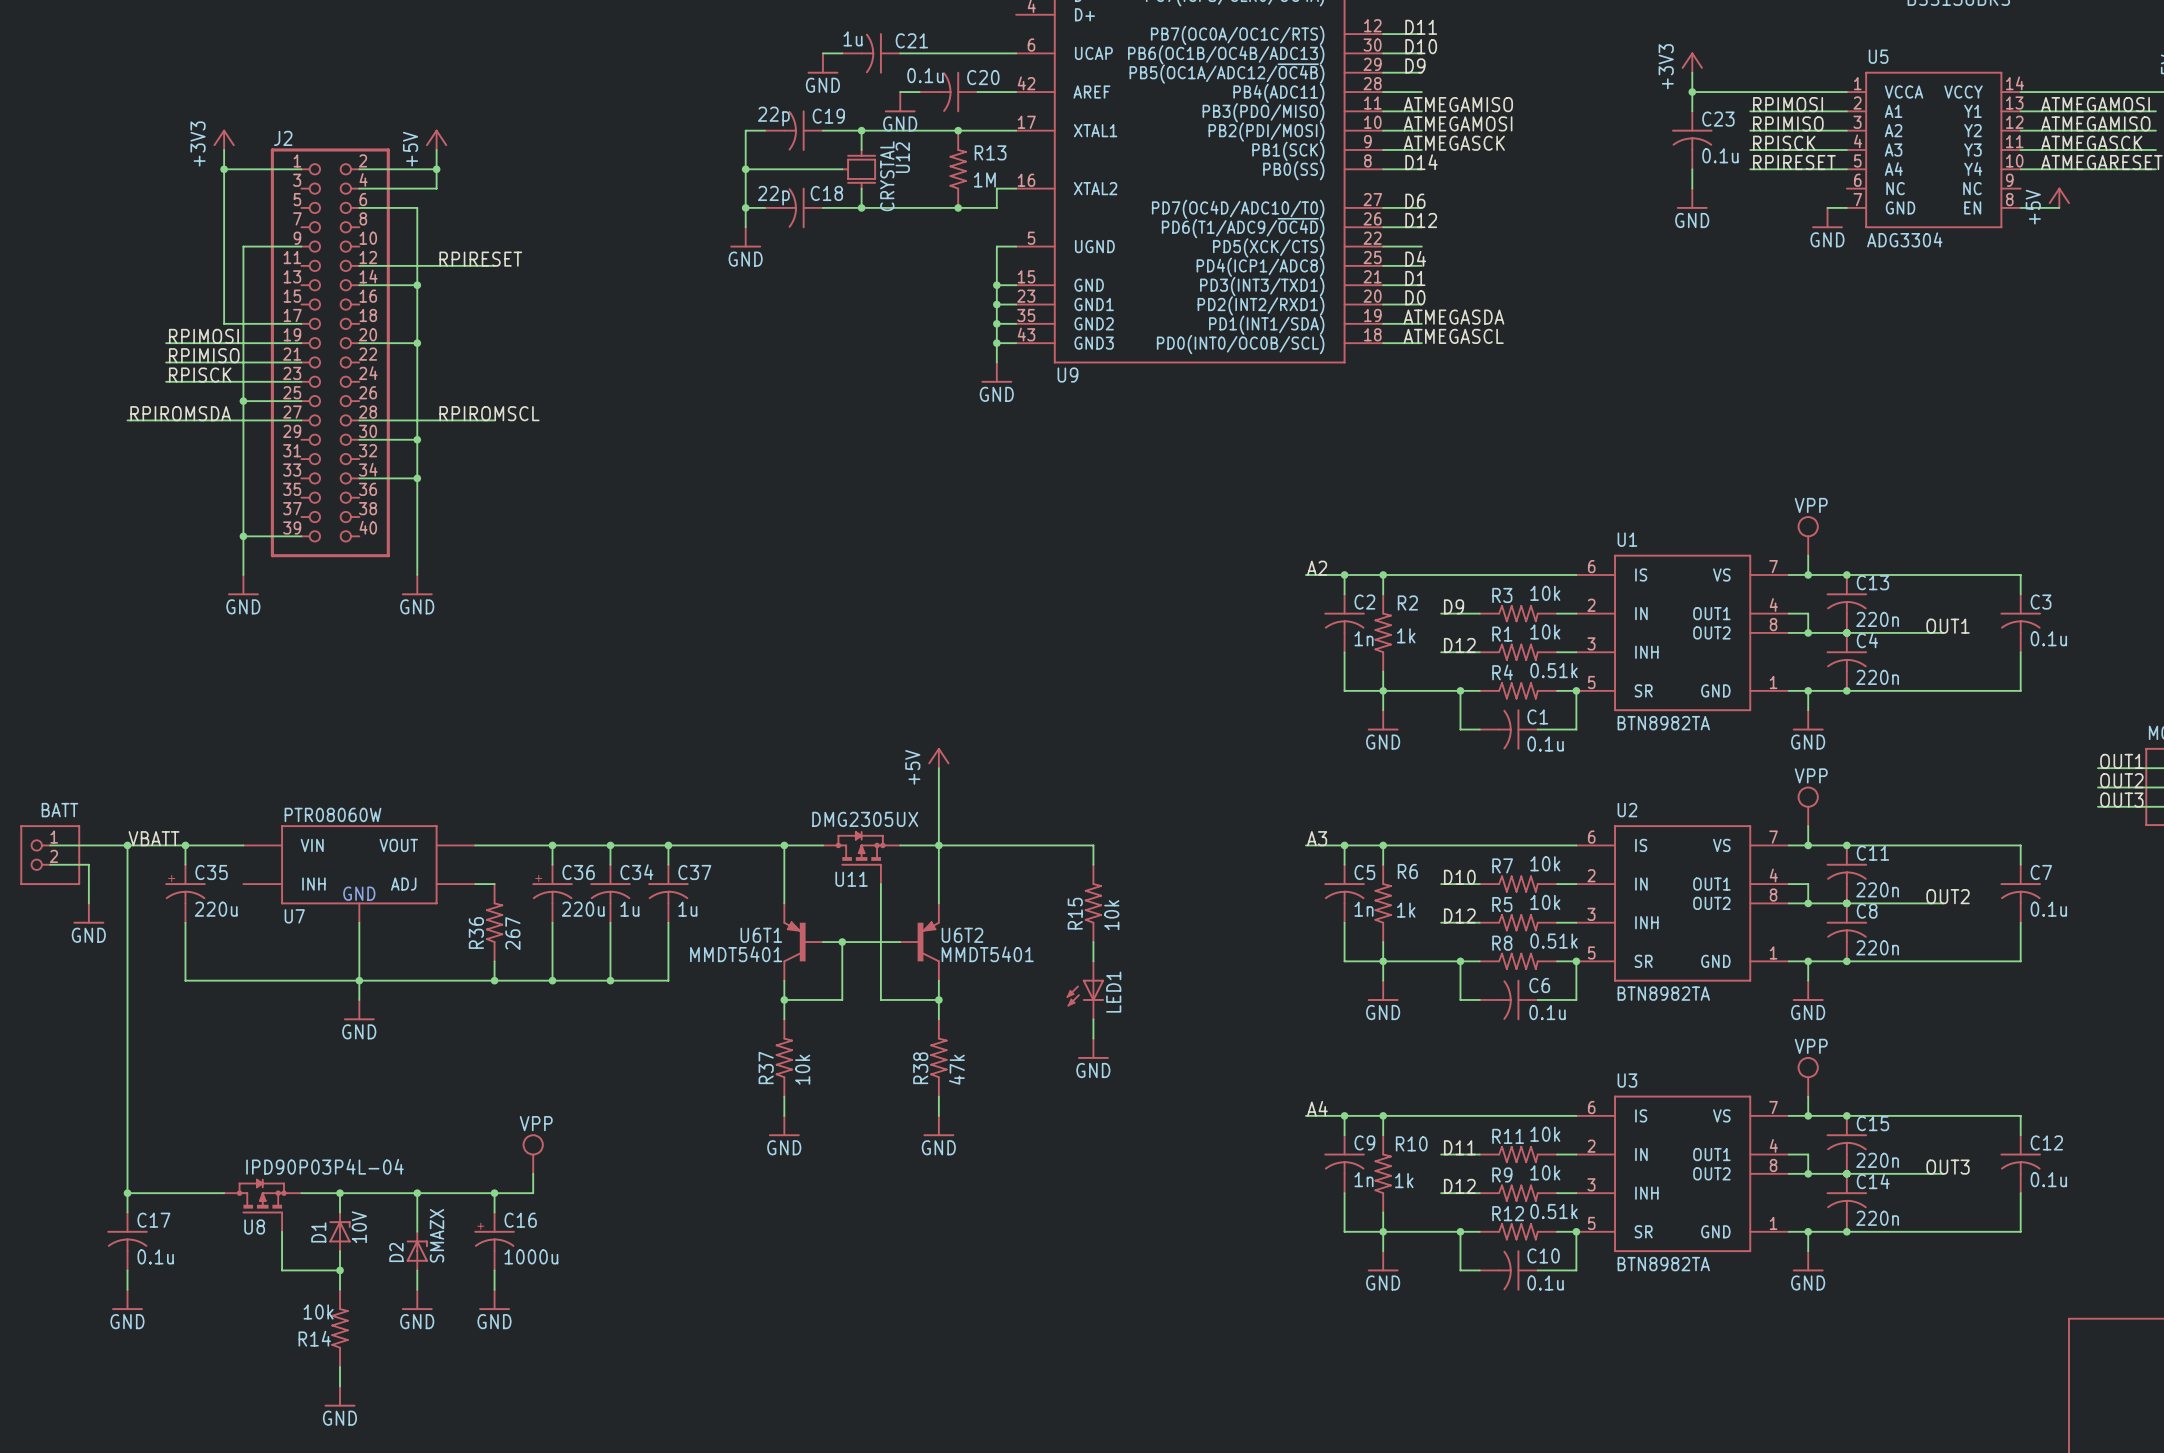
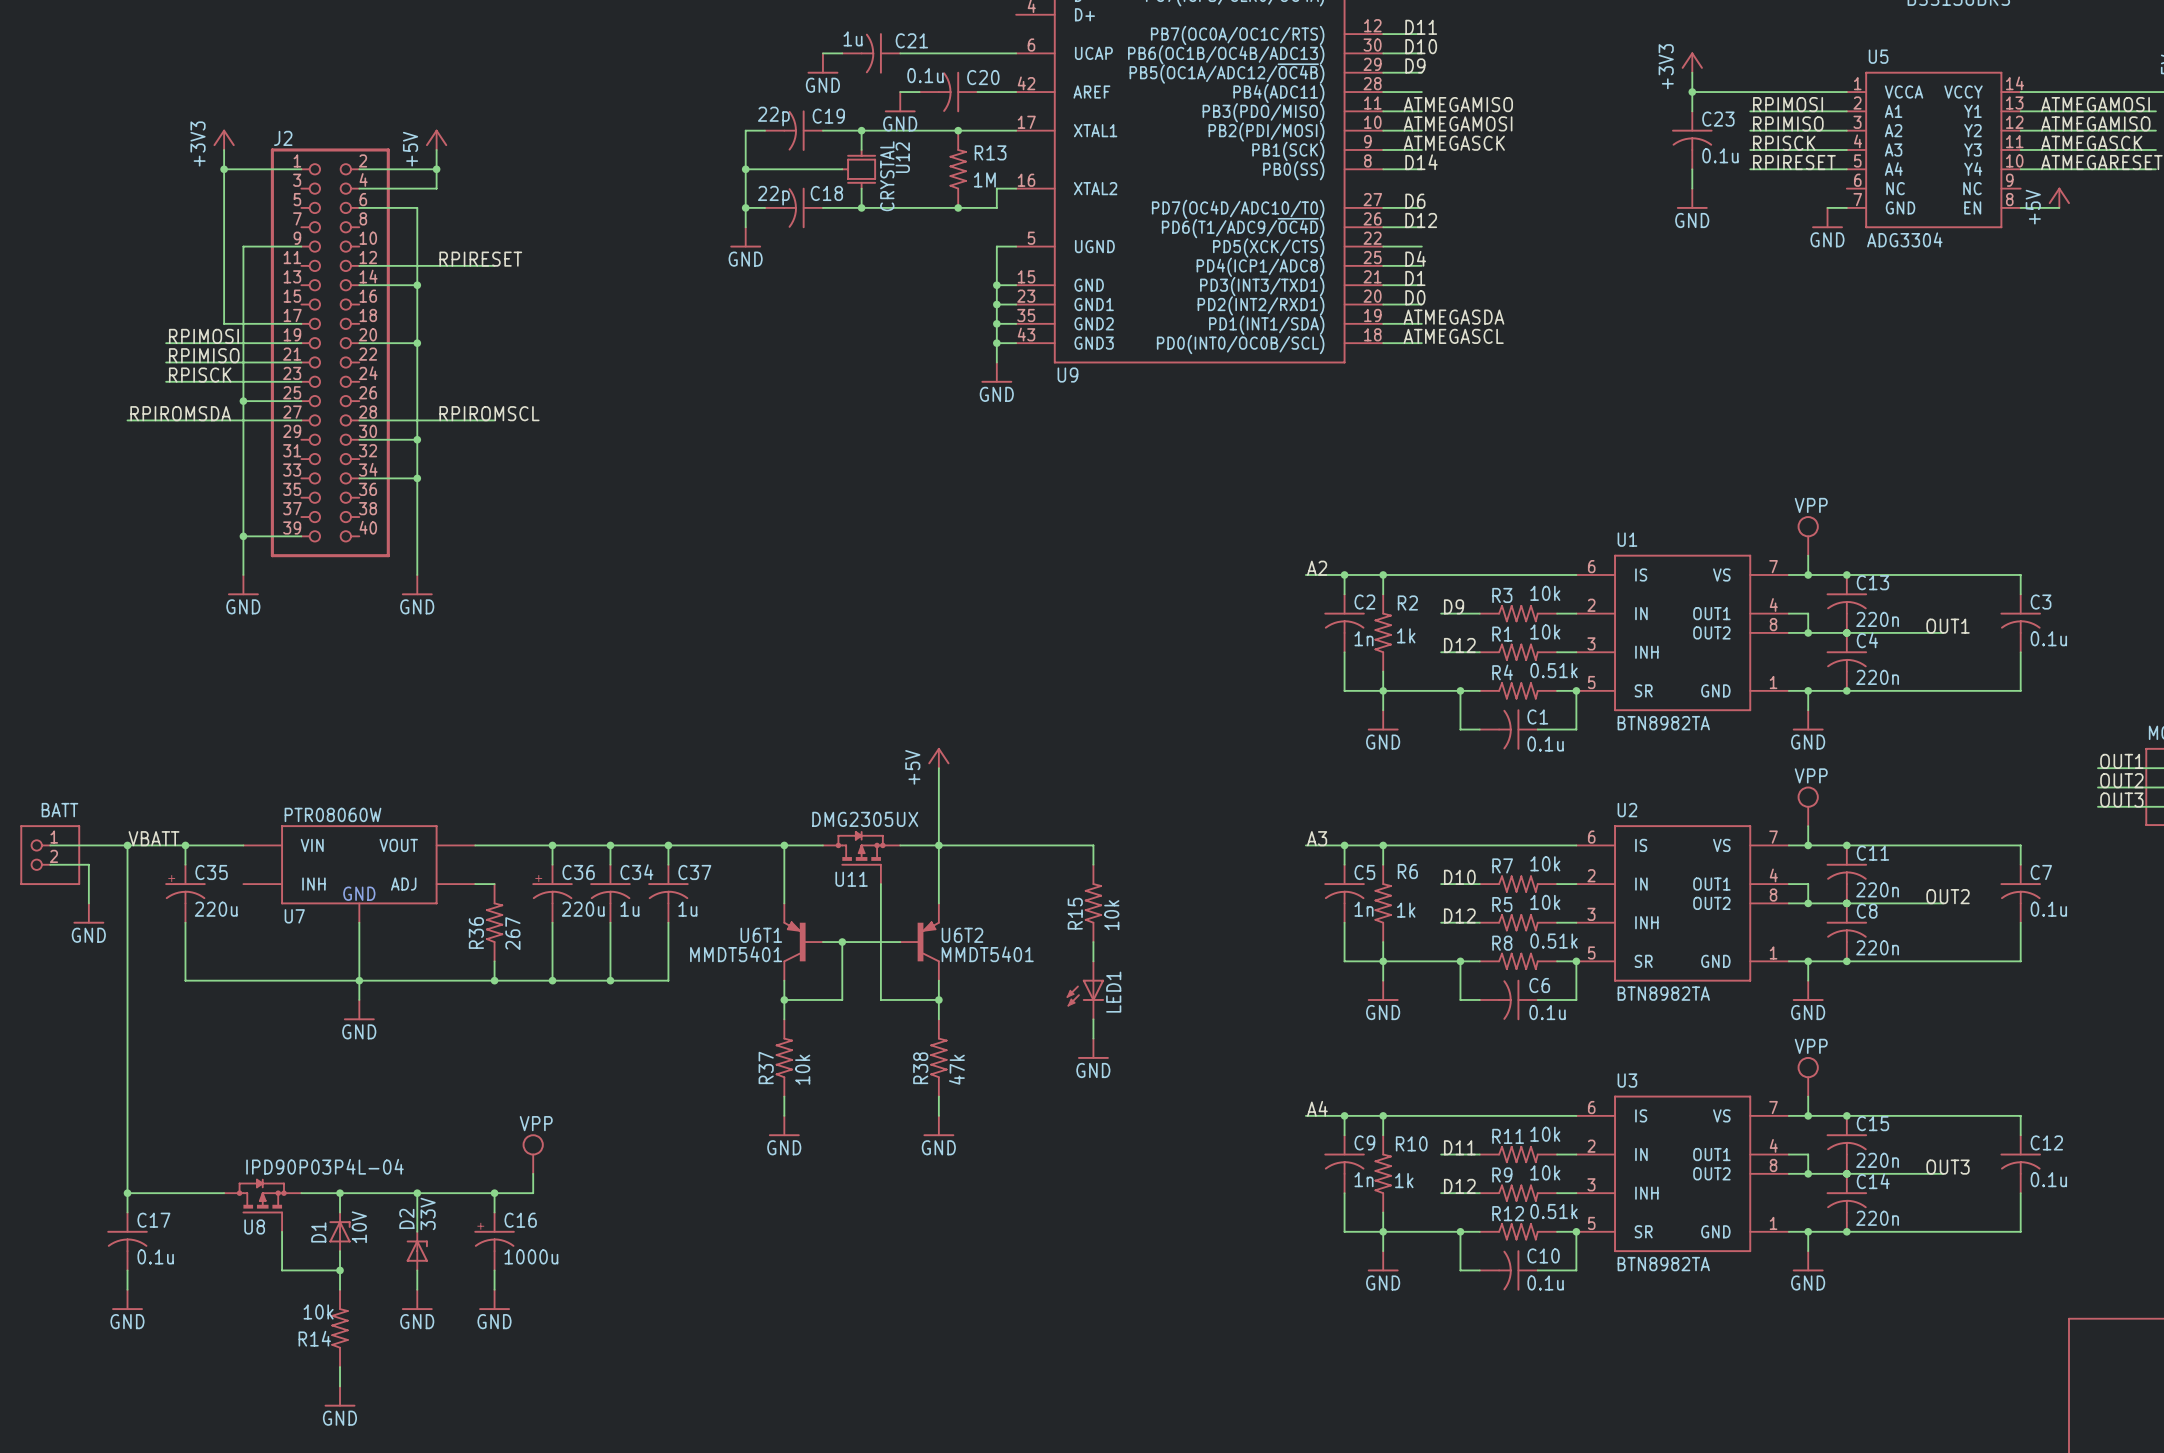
D2 value: SMAZX (436, 1235) -> 33V (428, 1214)
D2 name position: D2 (396, 1252) -> D2 (406, 1218)

